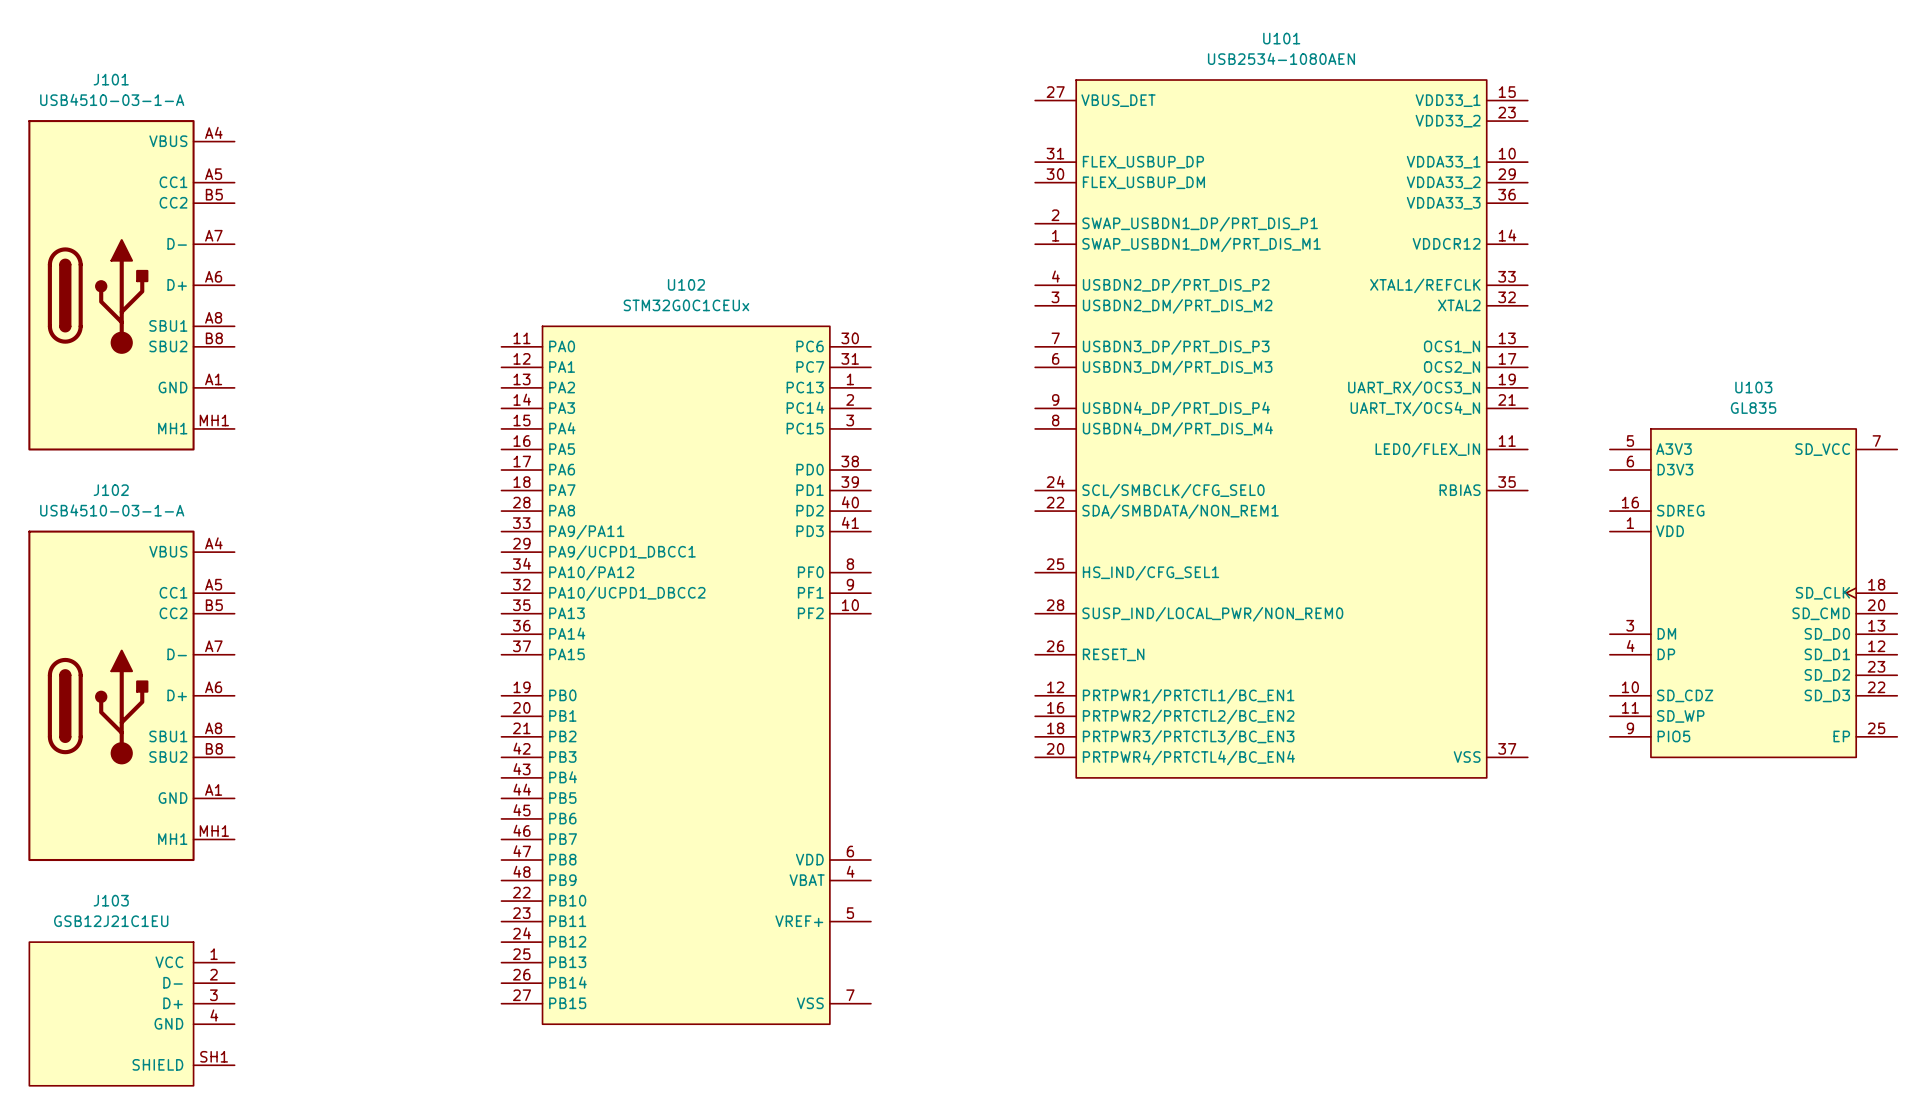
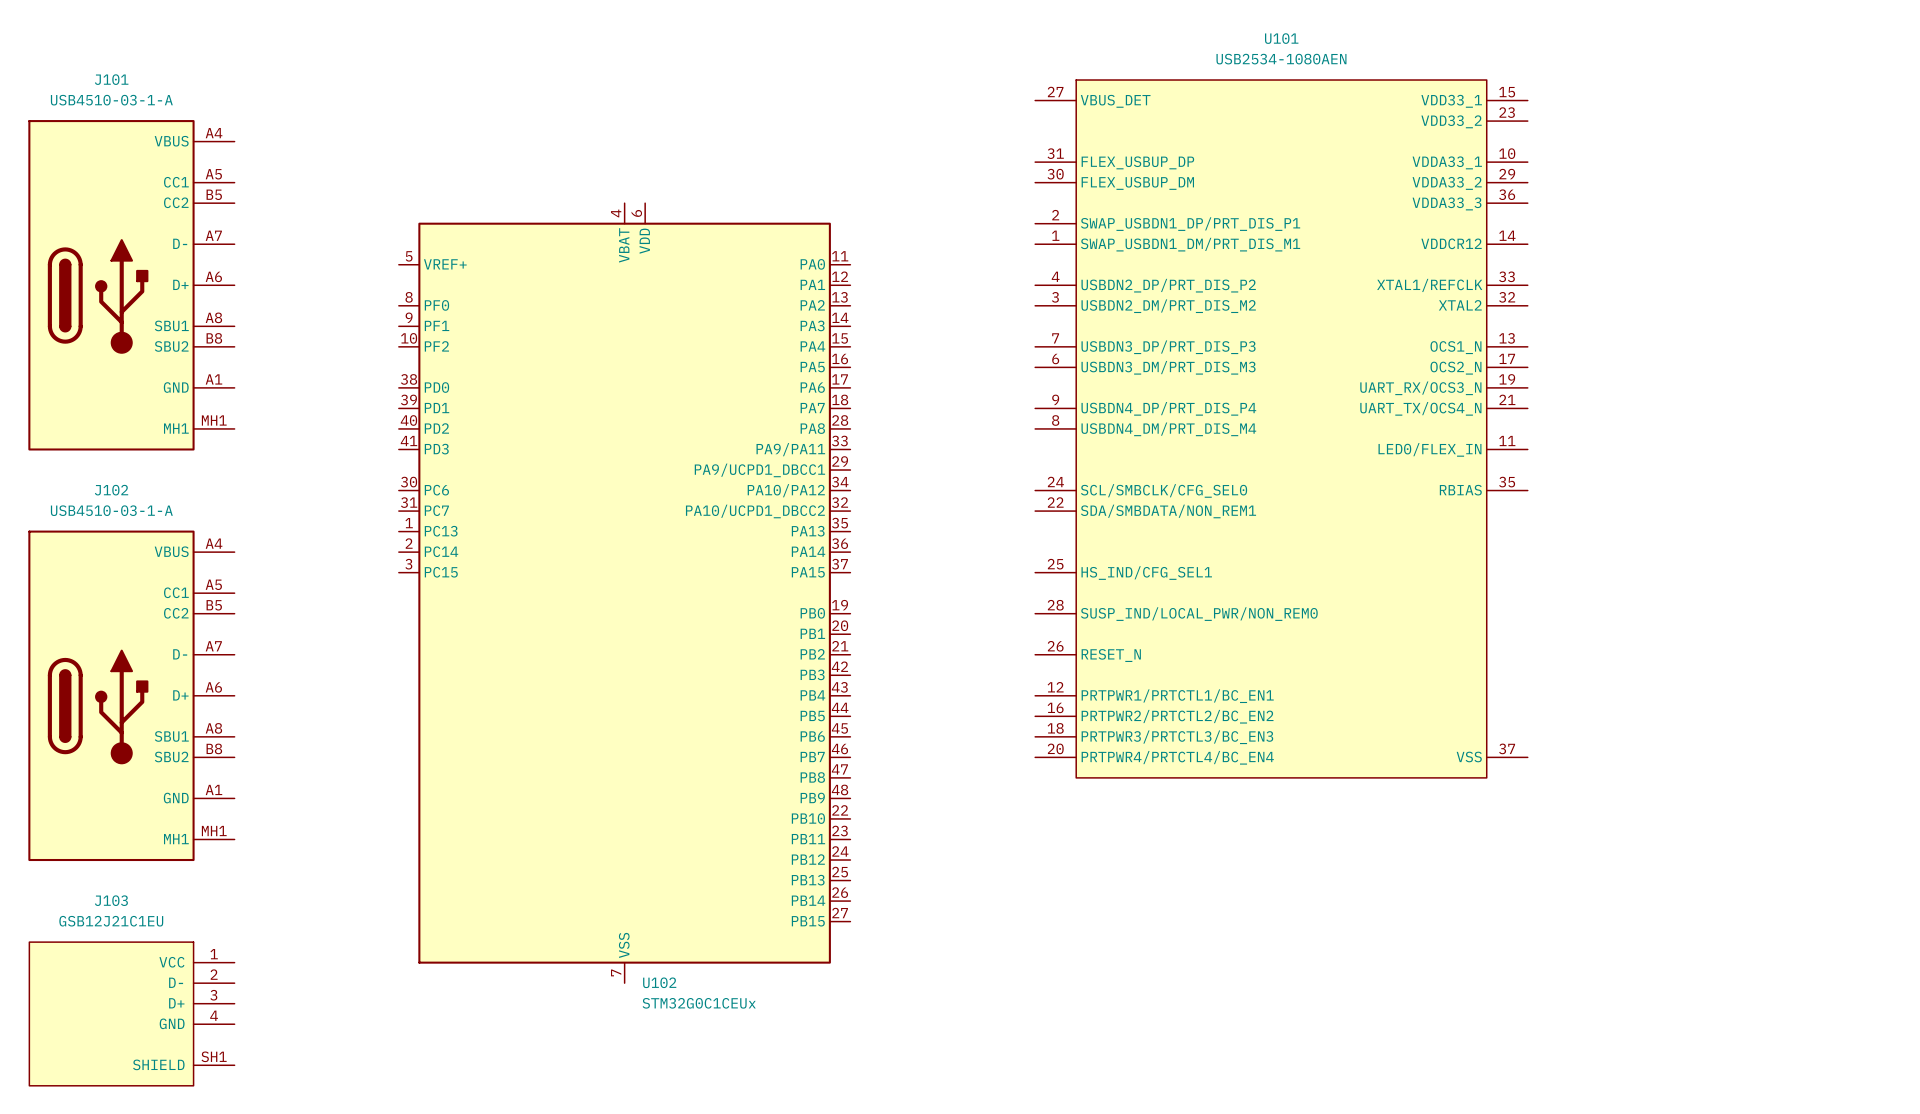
U102 name position: U102 (686, 284) -> U102 (659, 982)
U102 value position: STM32G0C1CEUx (686, 305) -> STM32G0C1CEUx (699, 1003)
U102 symbol: [501, 326, 871, 1025] -> [398, 203, 851, 984]
U103: GL835 (1753, 593) -> none

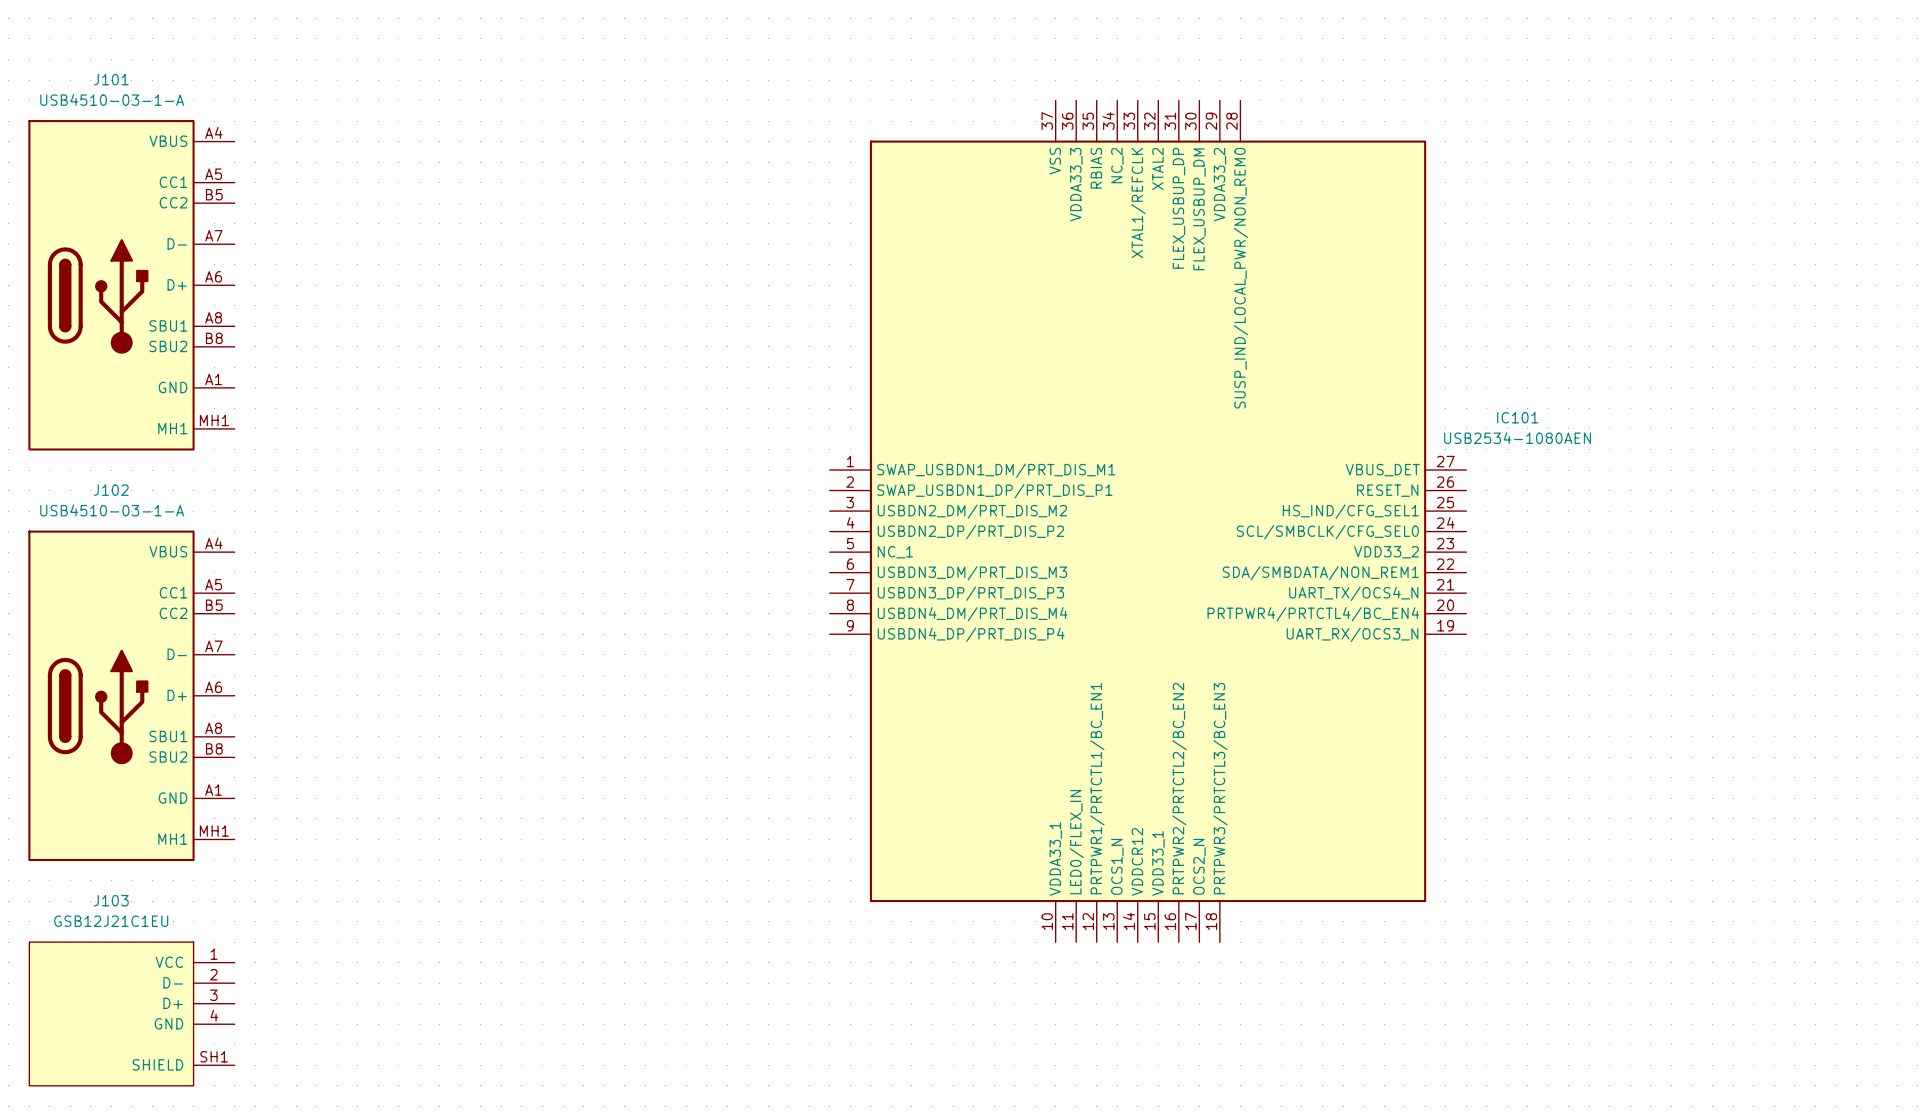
U101: USB2534-1080AEN (1281, 428) -> none
IC101: none -> USB2534-1080AEN (1148, 521)
U102: STM32G0C1CEUx (624, 593) -> none

